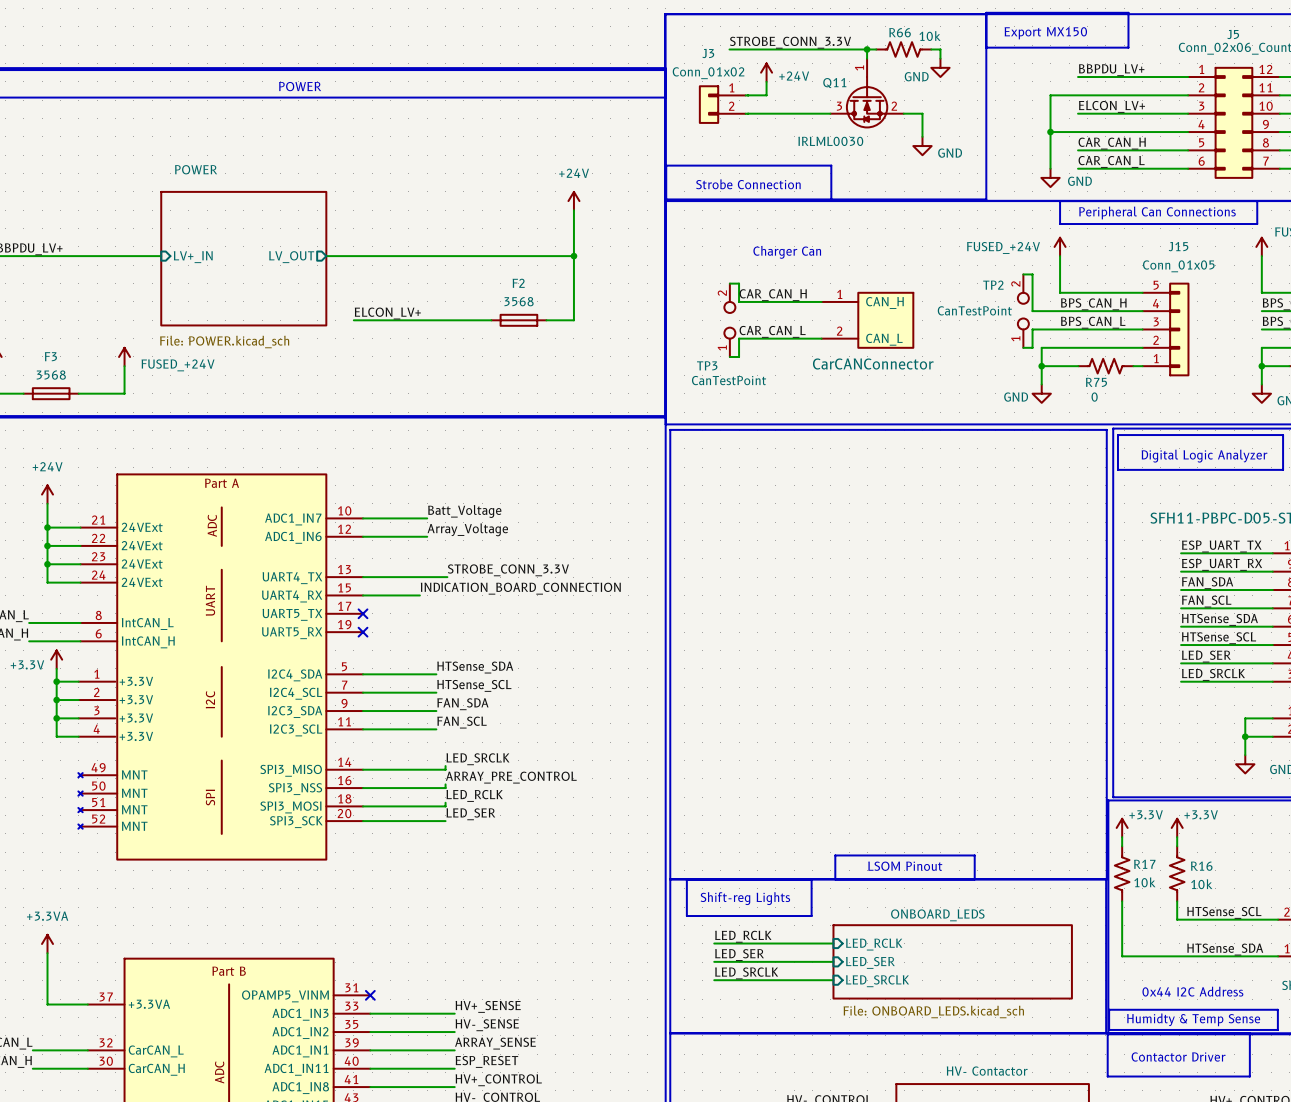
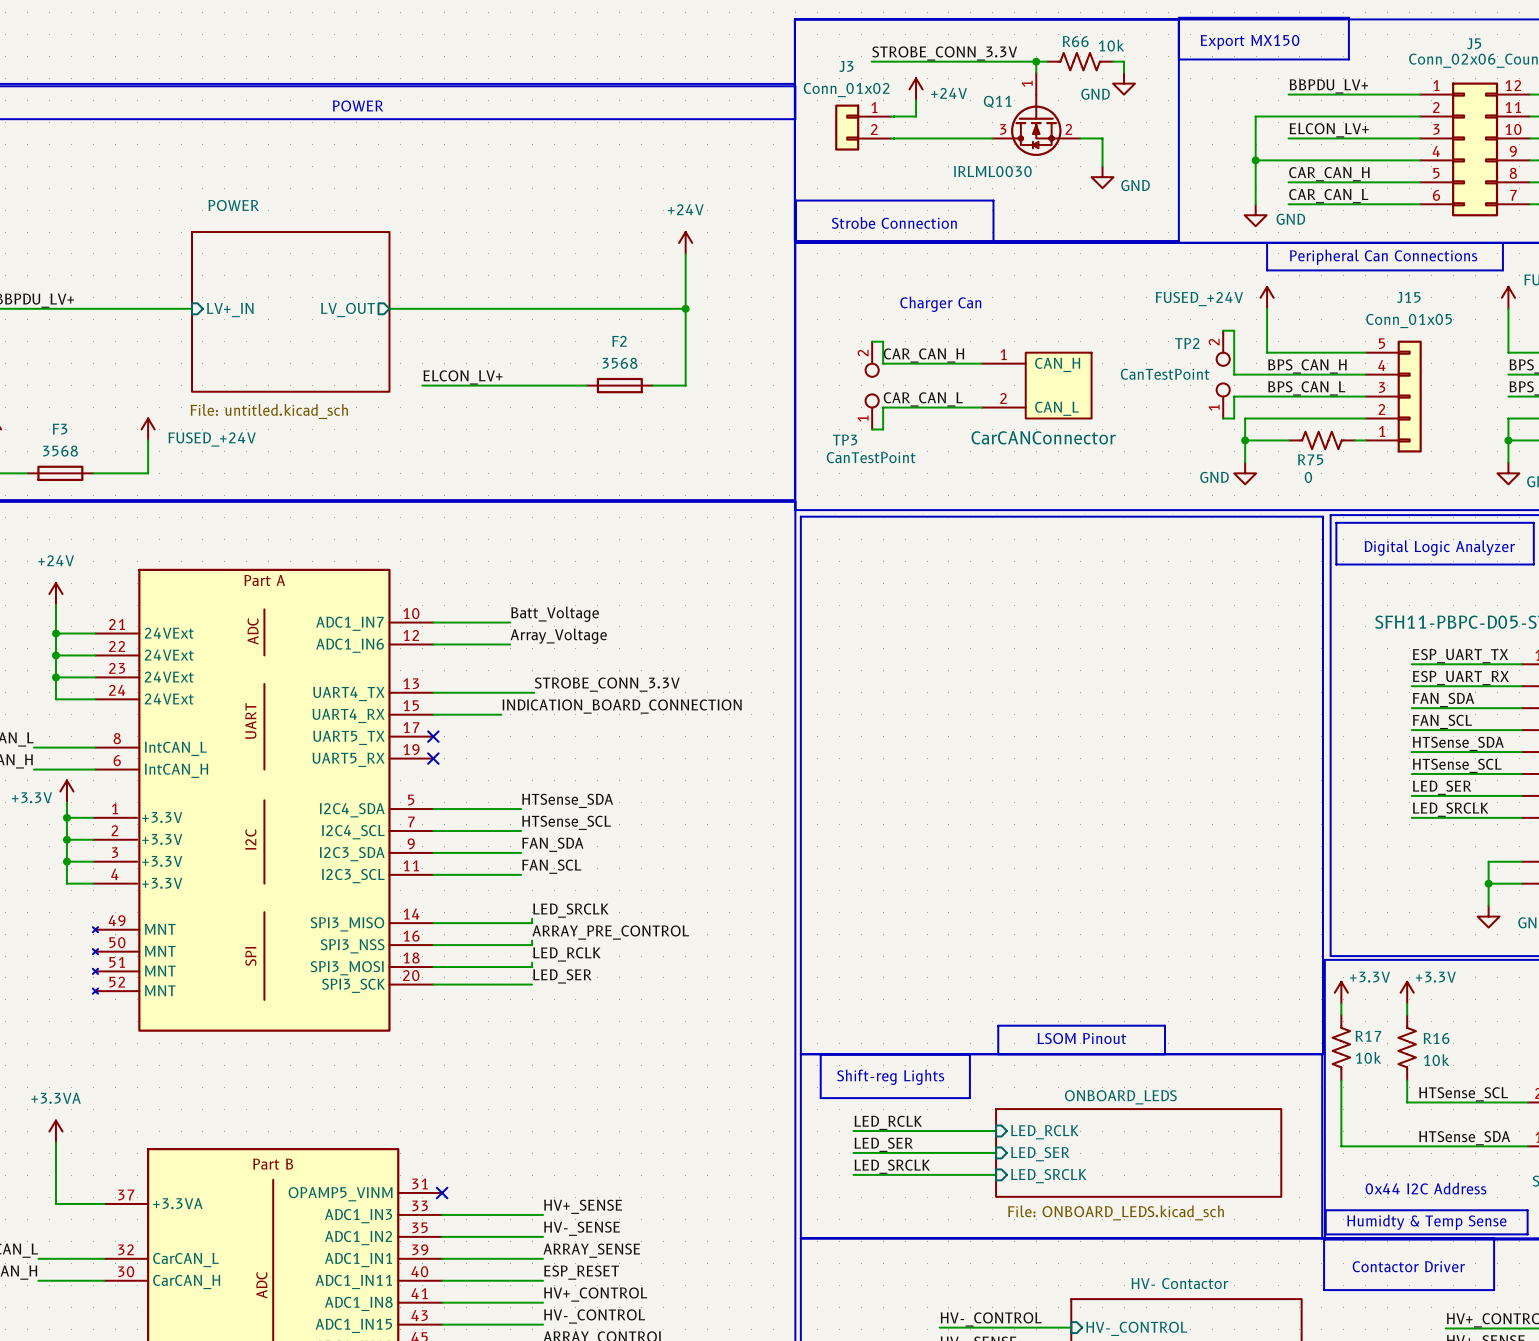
sheet POWER value: File: POWER.kicad_sch (224, 341) -> File: untitled.kicad_sch (269, 411)

